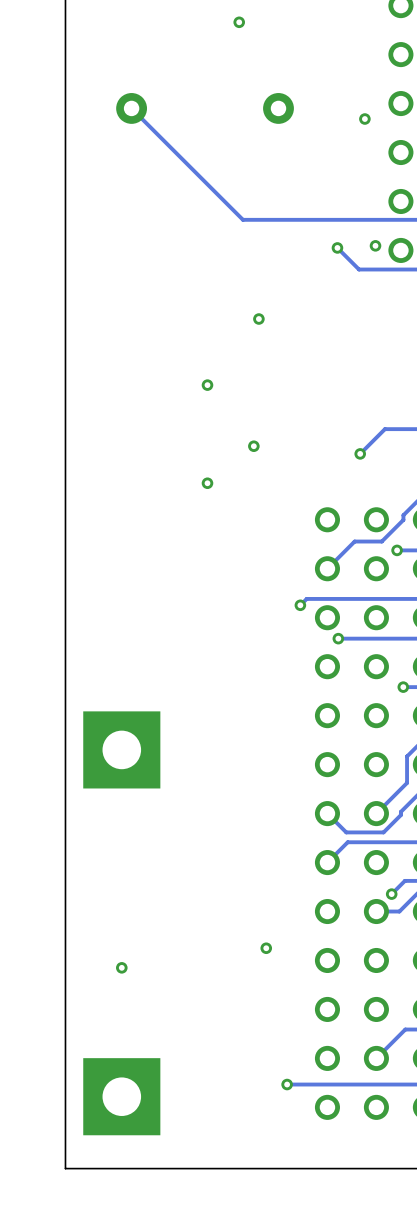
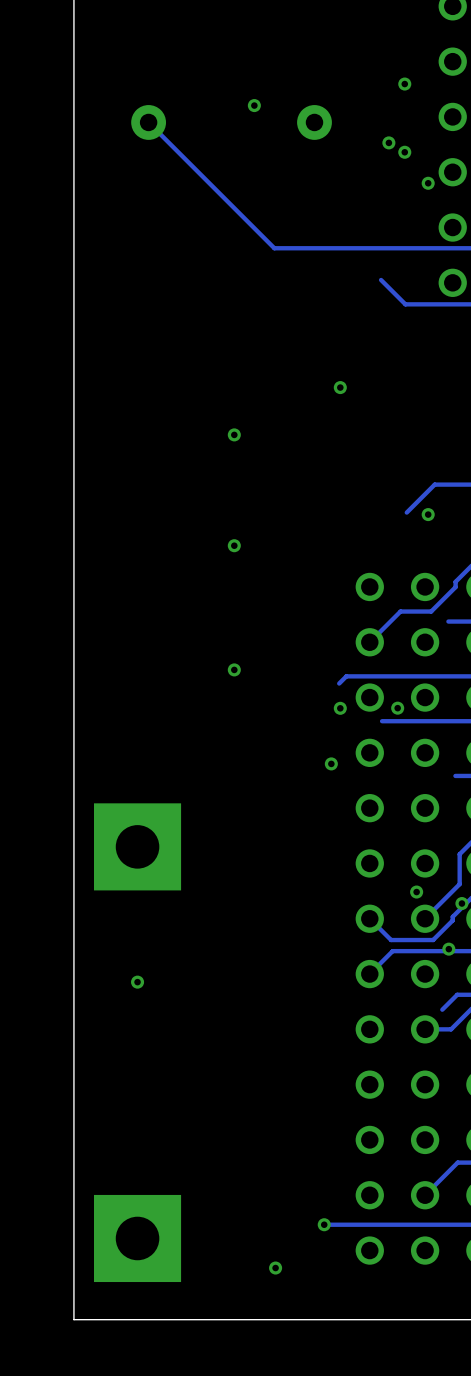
via: (239, 22) -> none
via: none -> (404, 84)
via: none -> (254, 105)
via: (364, 119) -> none
via: none -> (388, 142)
via: none -> (404, 152)
via: none -> (428, 183)
via: (375, 245) -> none
via: (337, 247) -> none
via position: (258, 319) -> (340, 387)
via: (253, 446) -> none
via position: (360, 453) -> (428, 514)
via: (397, 550) -> none
via: none -> (234, 669)
via: (300, 605) -> none
via: none -> (340, 708)
via position: (338, 638) -> (397, 708)
via: none -> (331, 763)
via: (403, 687) -> none
via: none -> (416, 892)
via: none -> (461, 903)
via: none -> (448, 949)
via: none -> (137, 982)
via: (391, 894) -> none
via: (266, 948) -> none
via: (121, 967) -> none
via: none -> (275, 1268)

